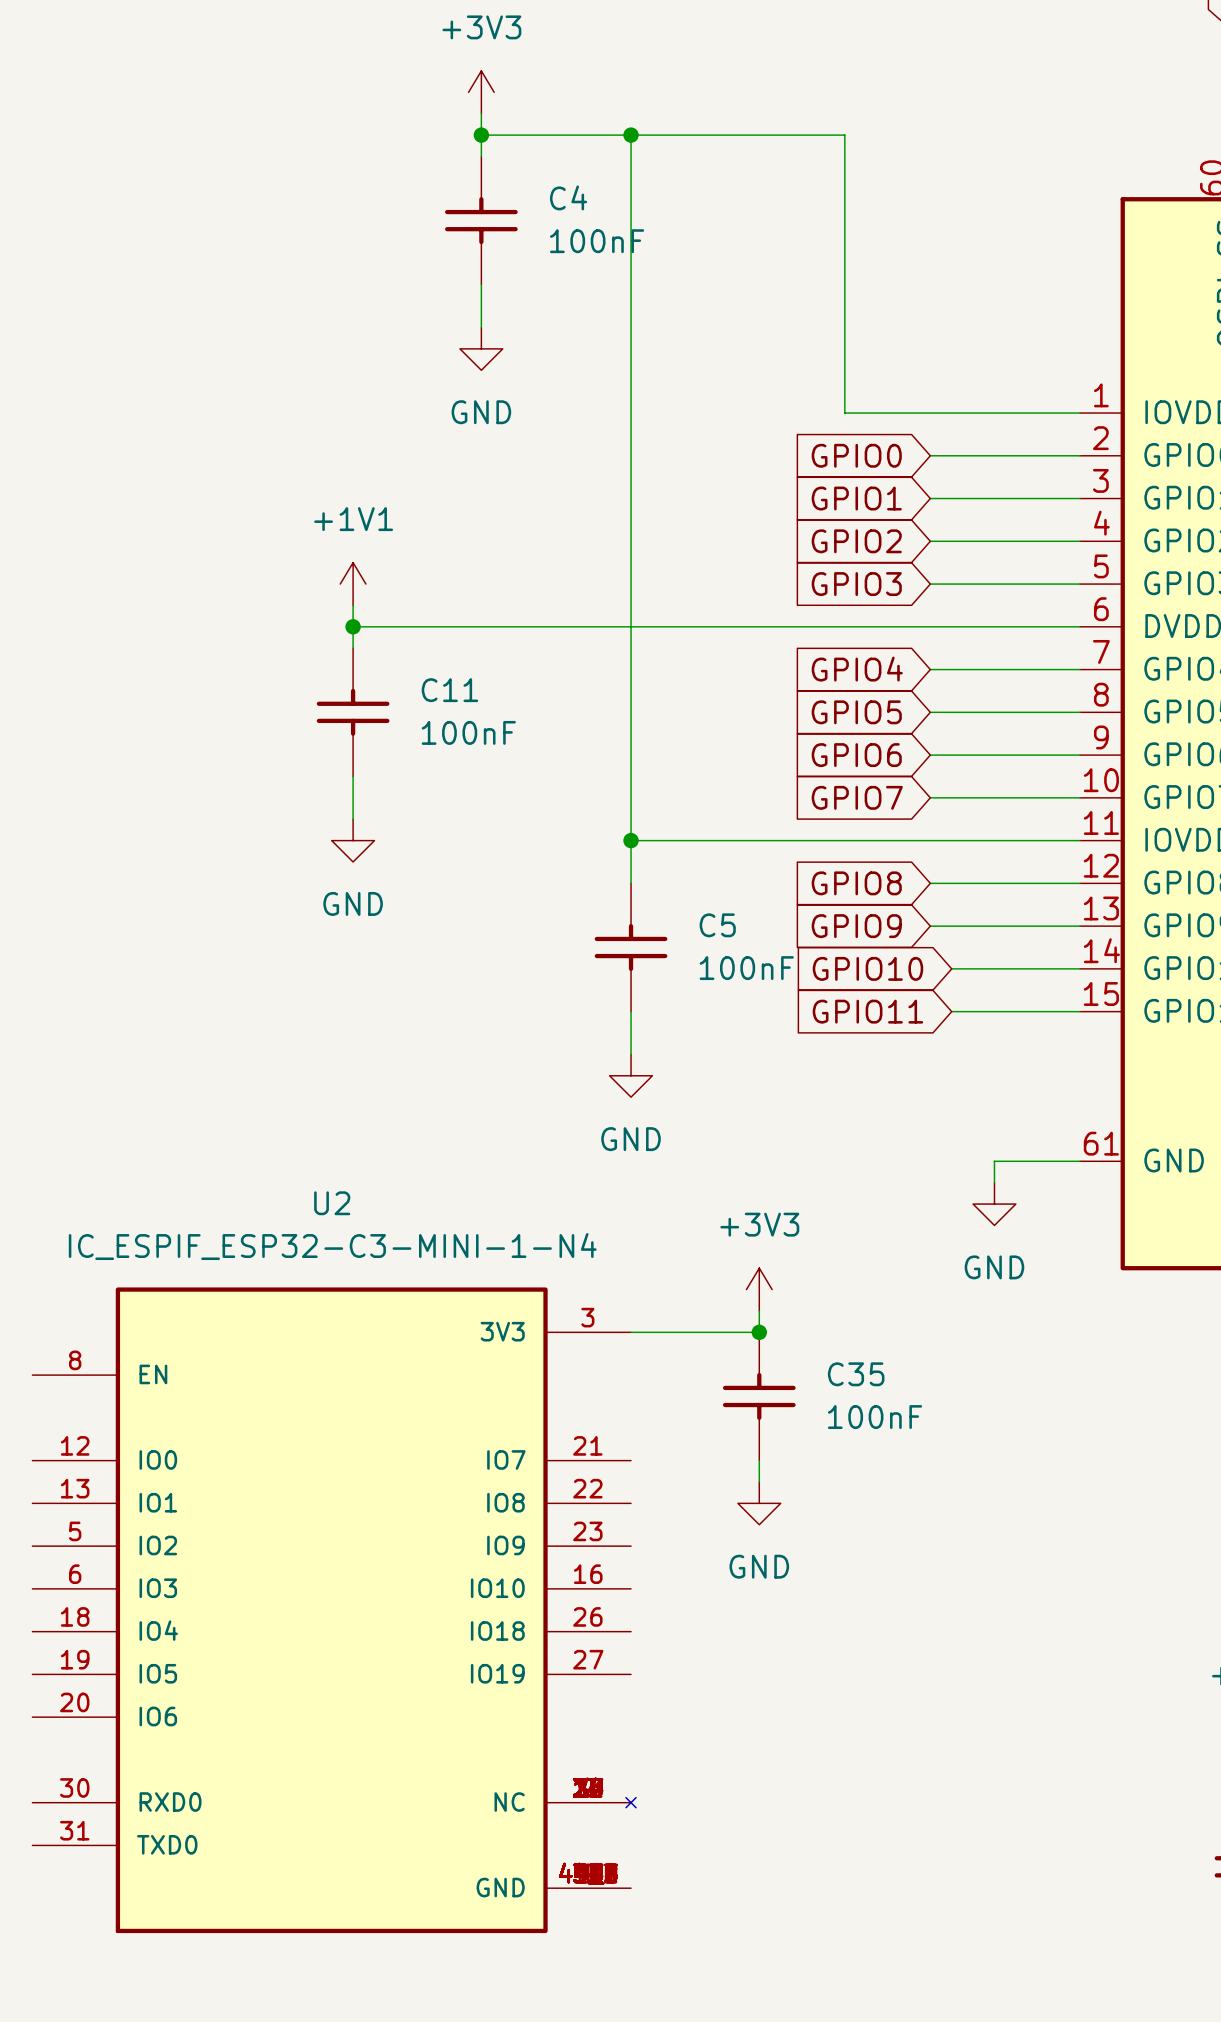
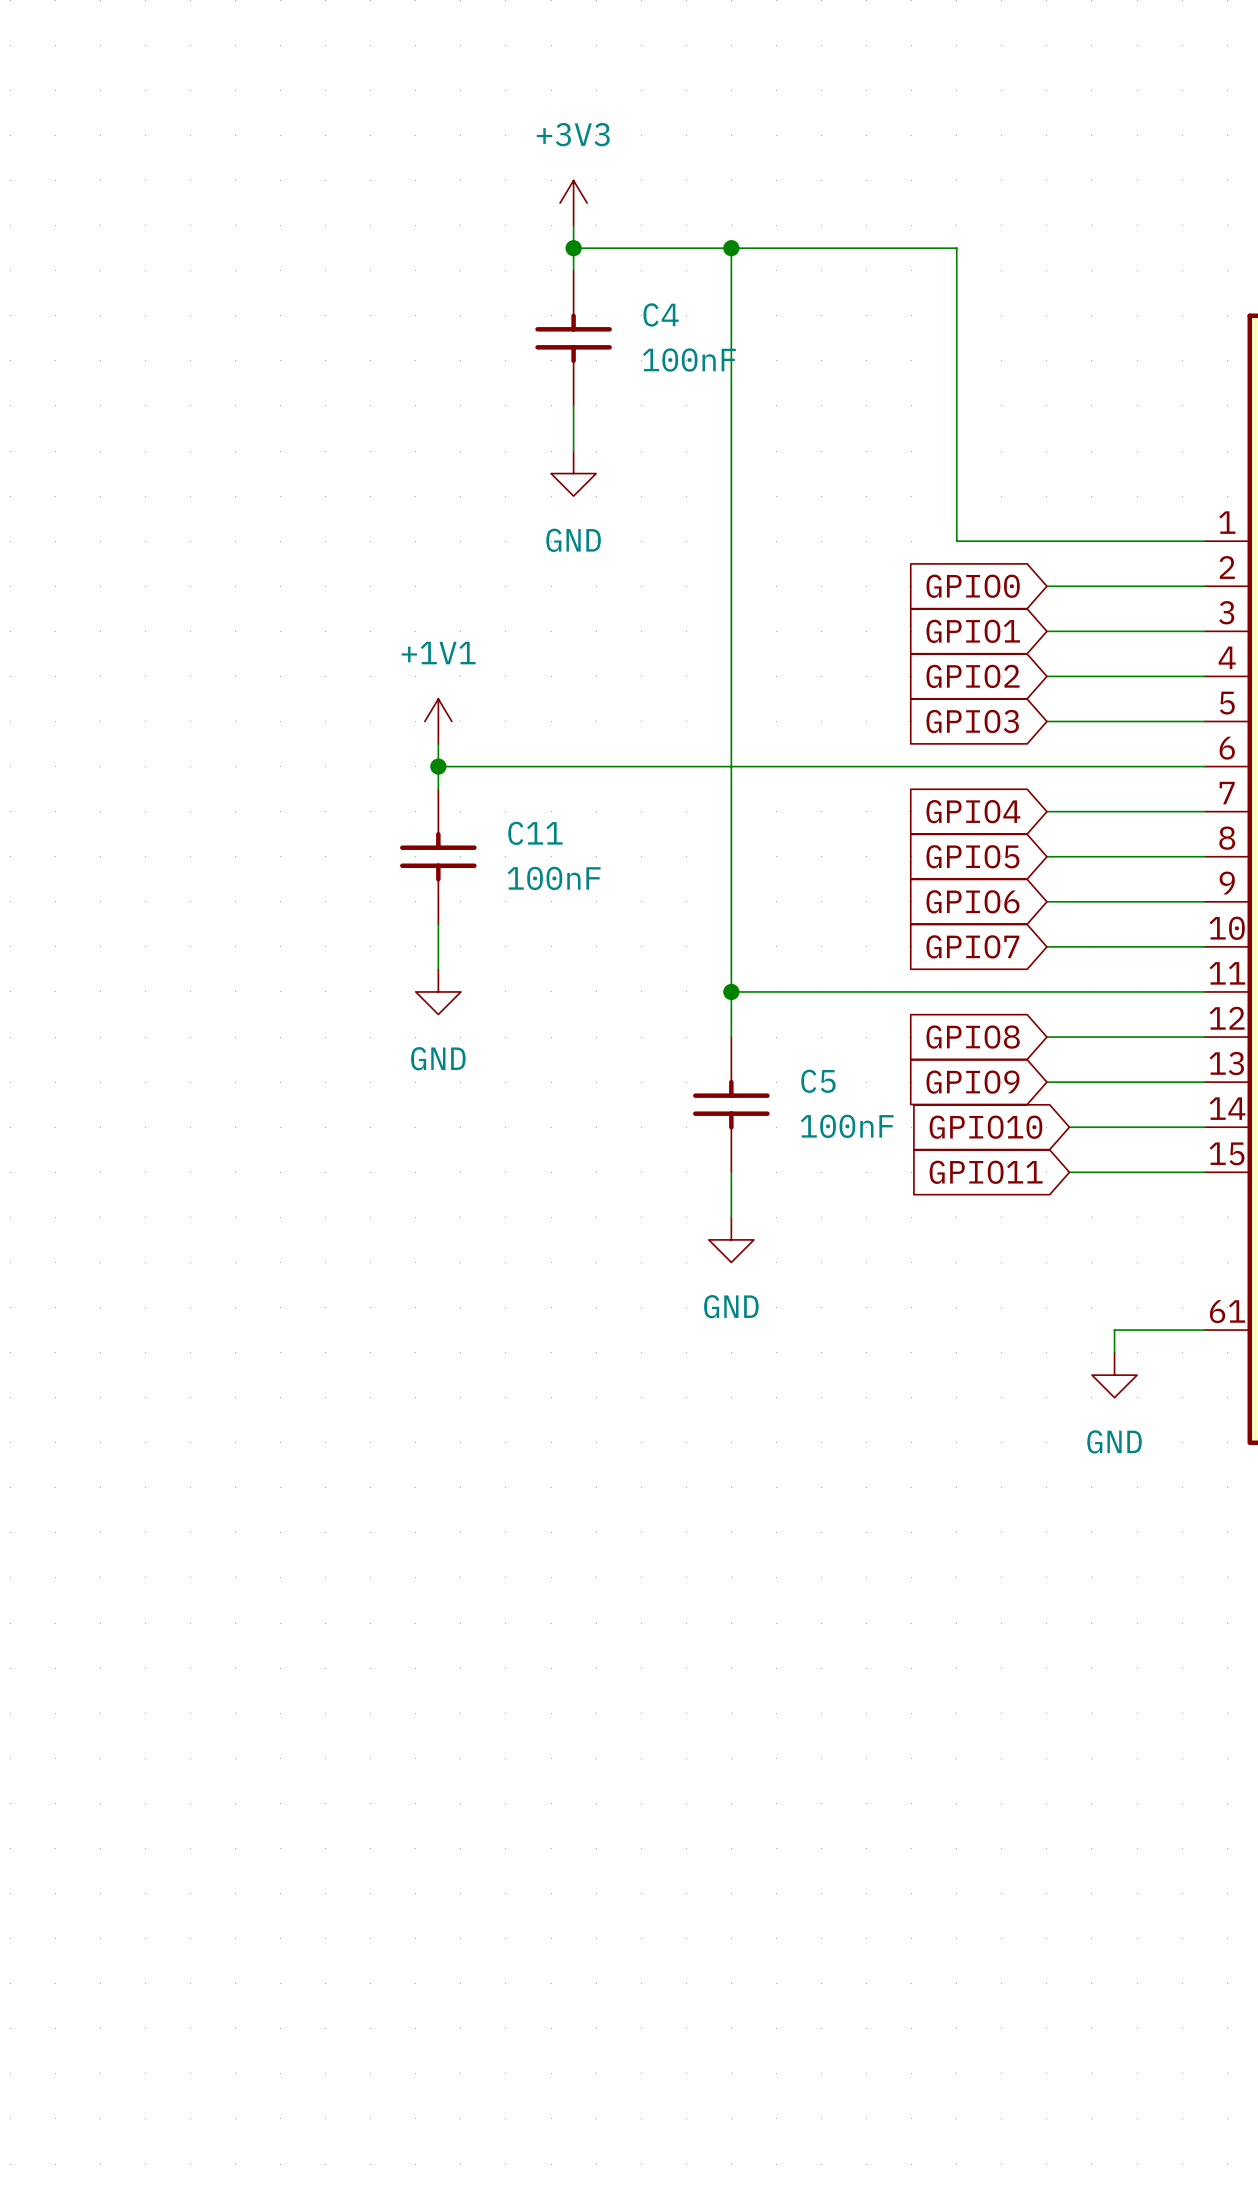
power symbol: +3V3 (759, 1289) -> none
wire: (759, 1310) (759, 1332) (631, 1332) -> none
junction: (759, 1332) -> none
C35: (759, 1396) -> none
wire: (759, 1460) (759, 1481) -> none
power symbol: GND (759, 1503) -> none
U2: IC_ESPIF_ESP32-C3-MINI-1-N4 (334, 1610) -> none

